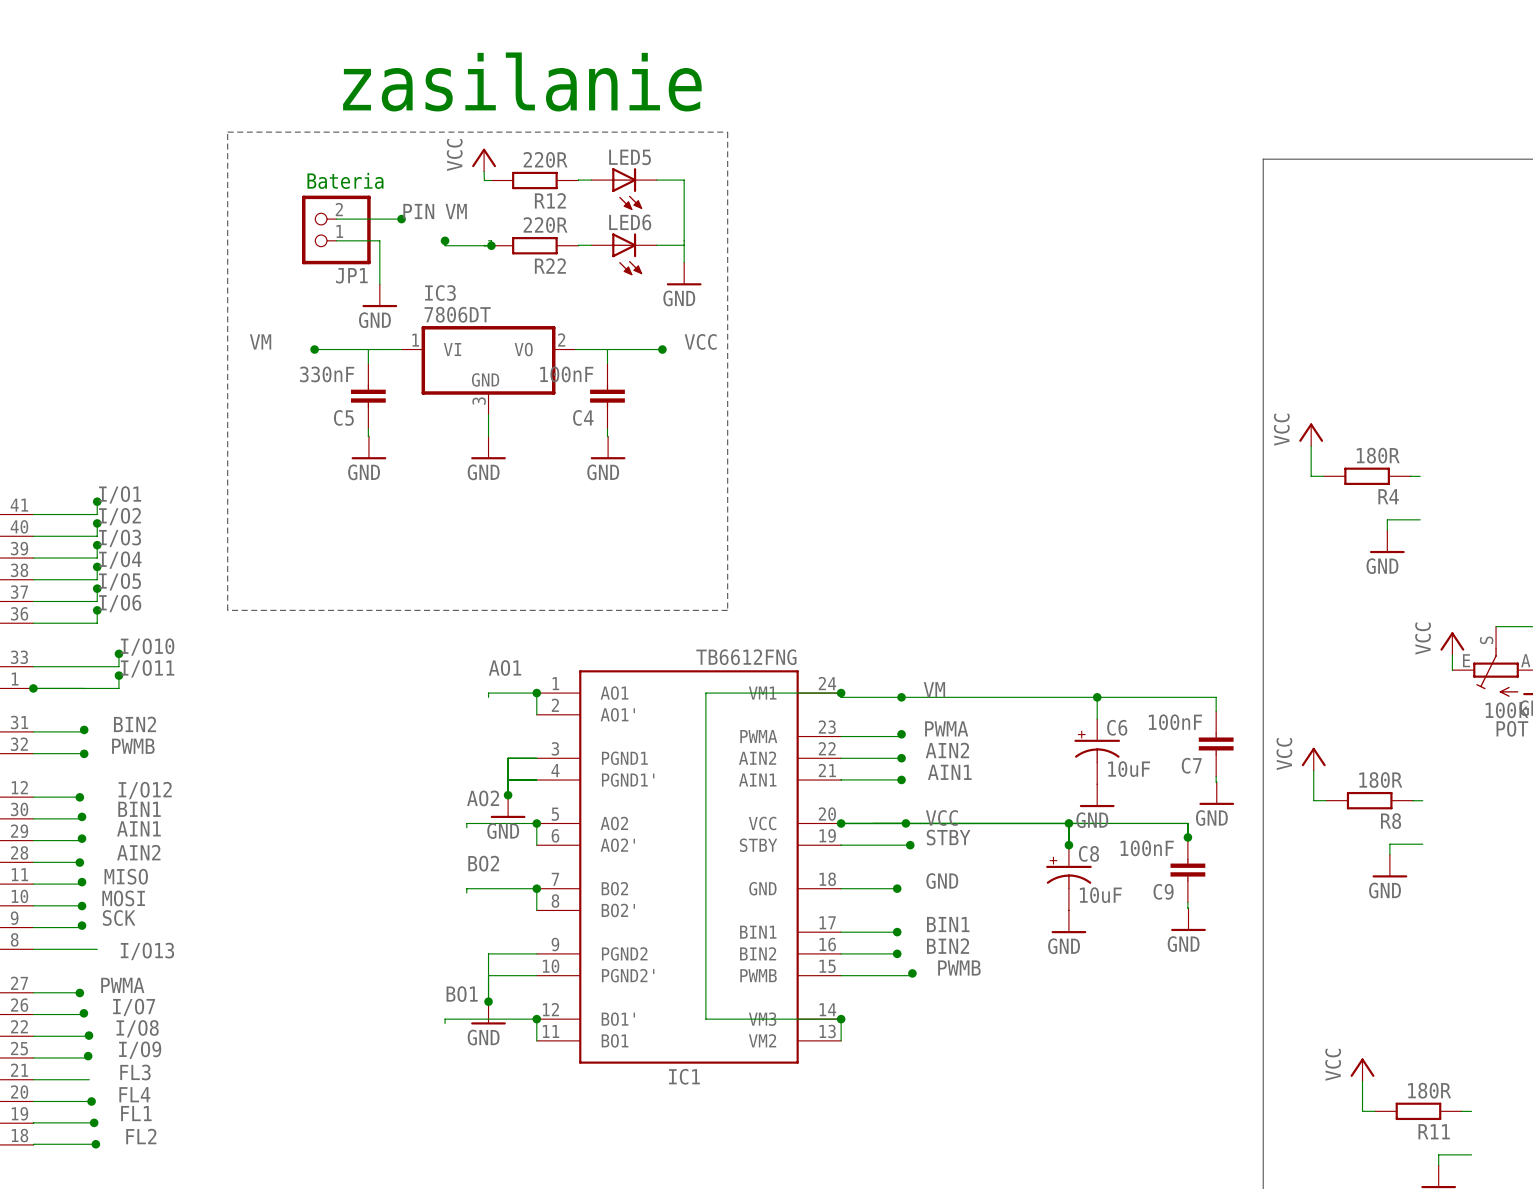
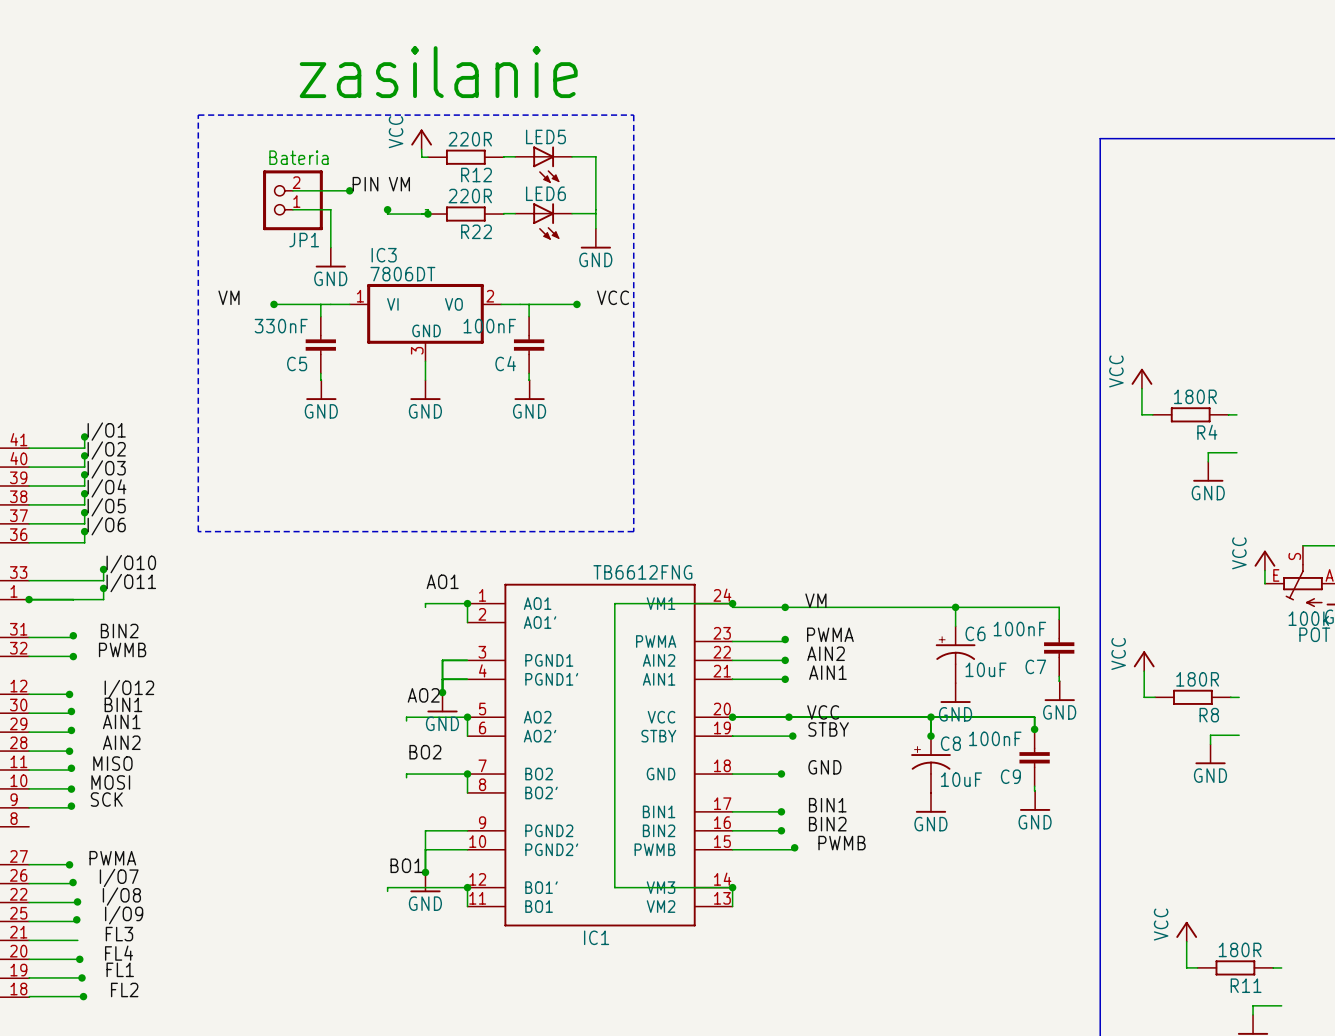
wire: (33, 949) (97, 949) -> none
label: I/O13 (147, 951) -> none

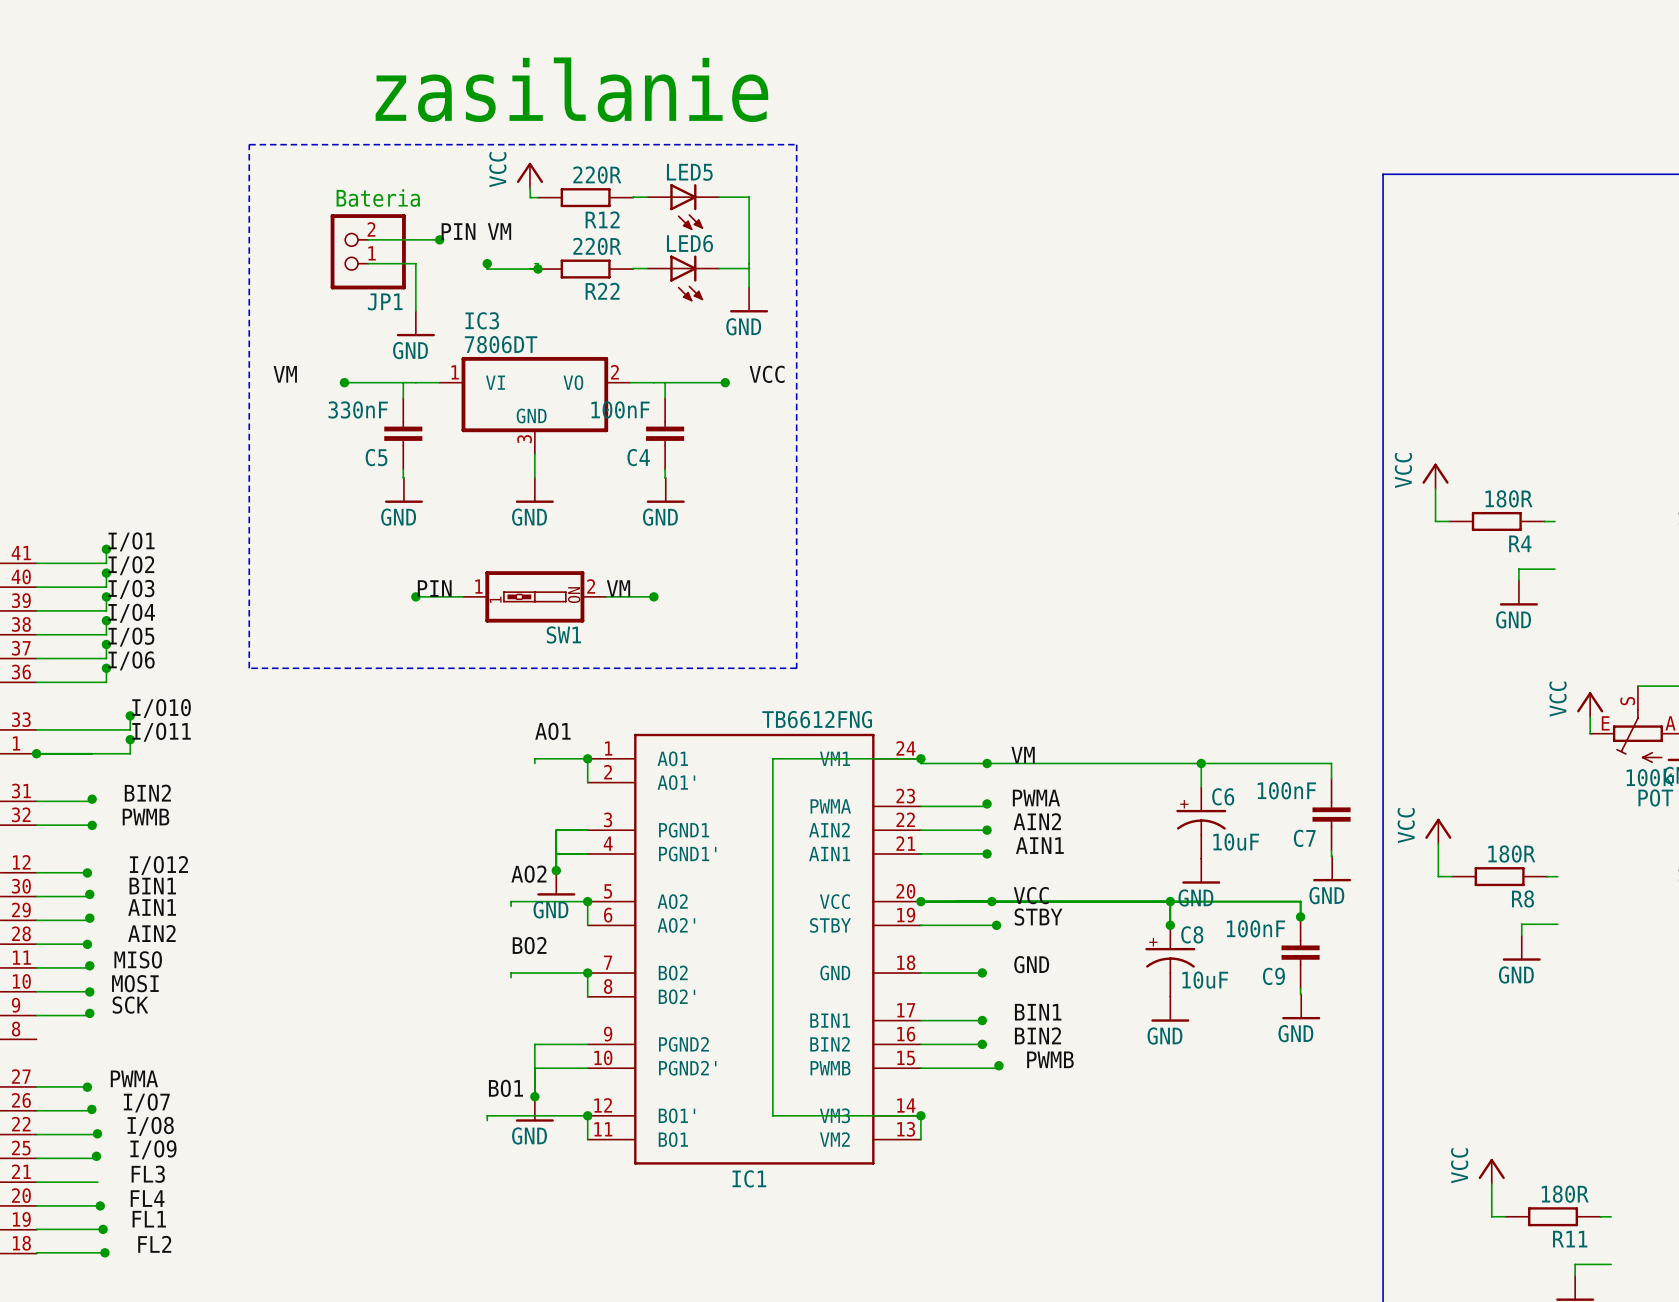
label: none -> PIN (434, 588)
label: none -> VM (618, 588)
wire: none -> (415, 596) (463, 596)
junction: none -> (415, 596)
SW1: none -> (534, 596)
wire: none -> (606, 596) (653, 596)
junction: none -> (653, 596)

